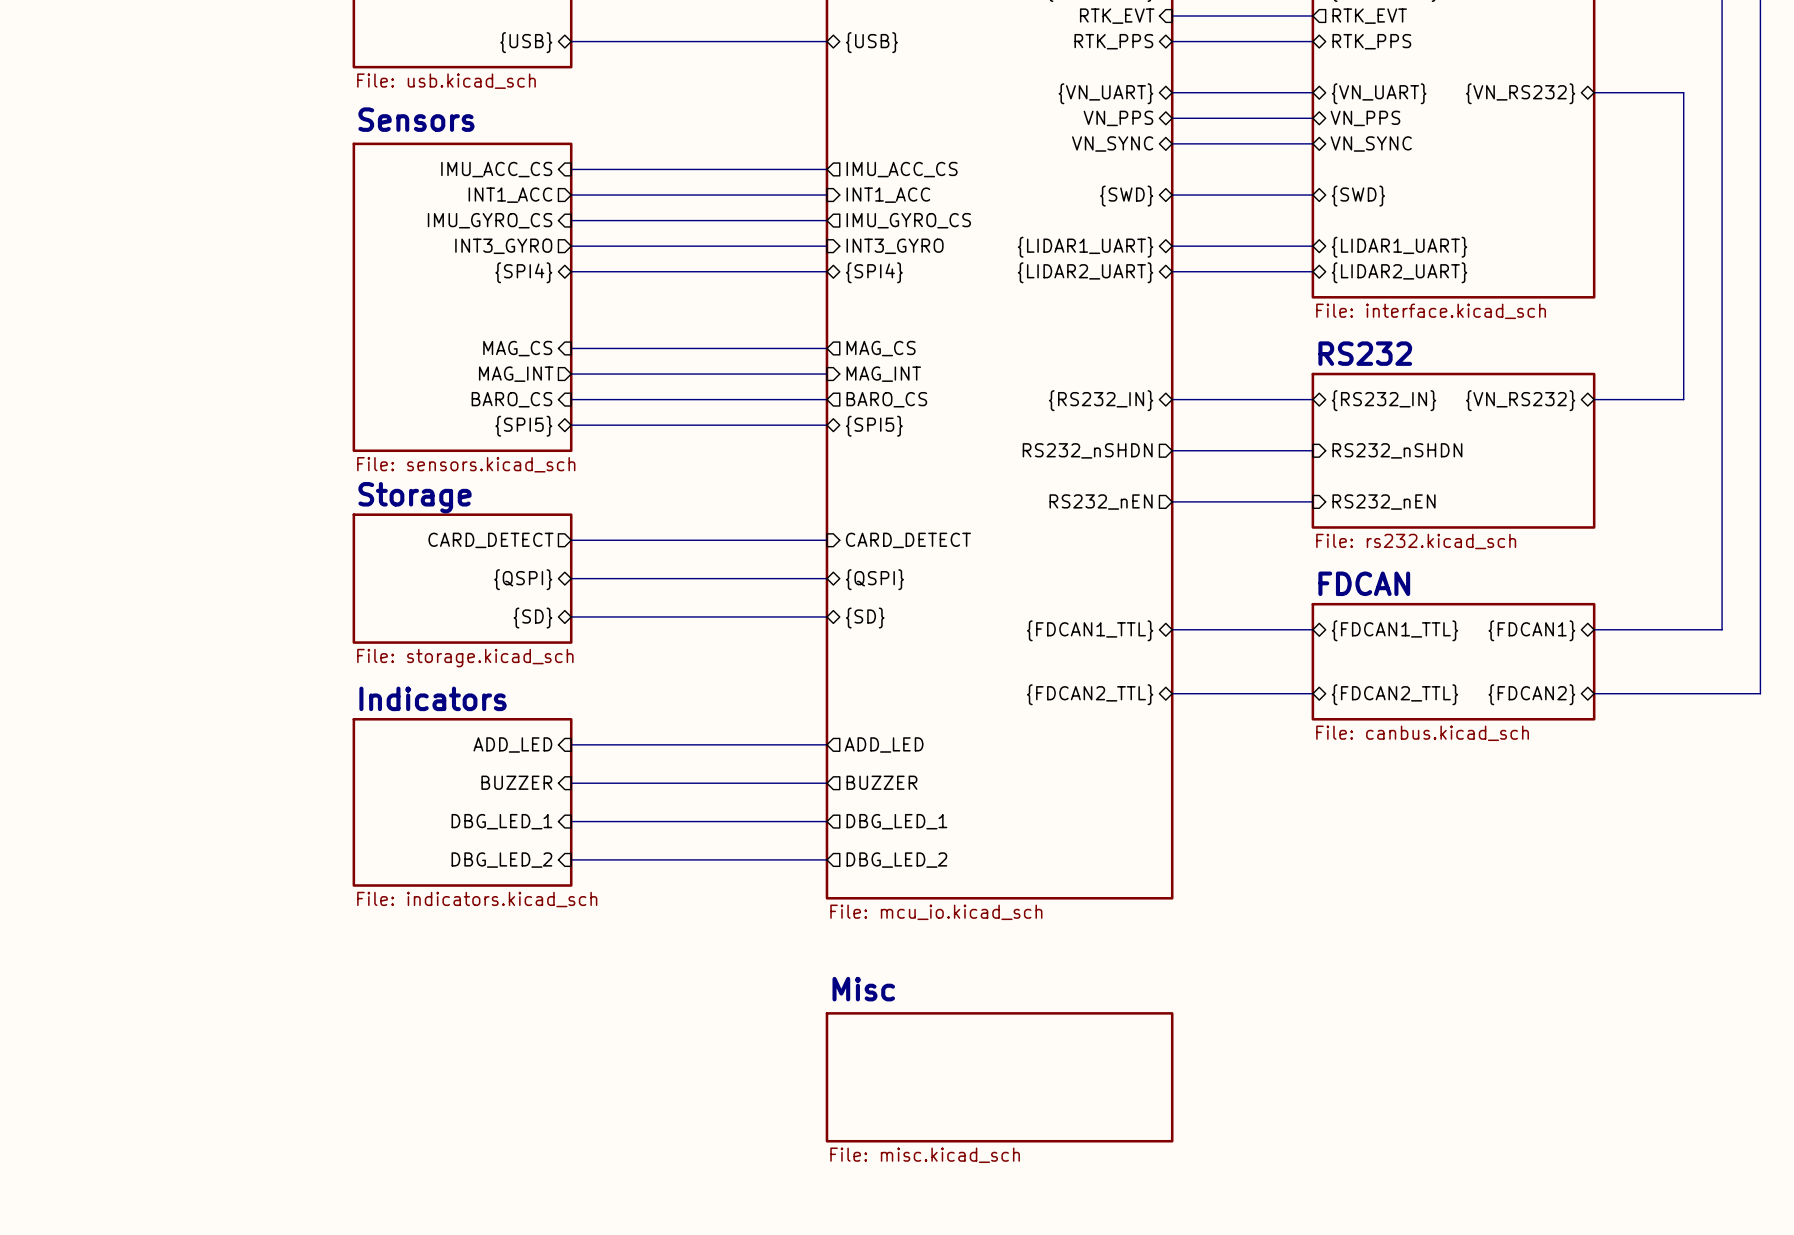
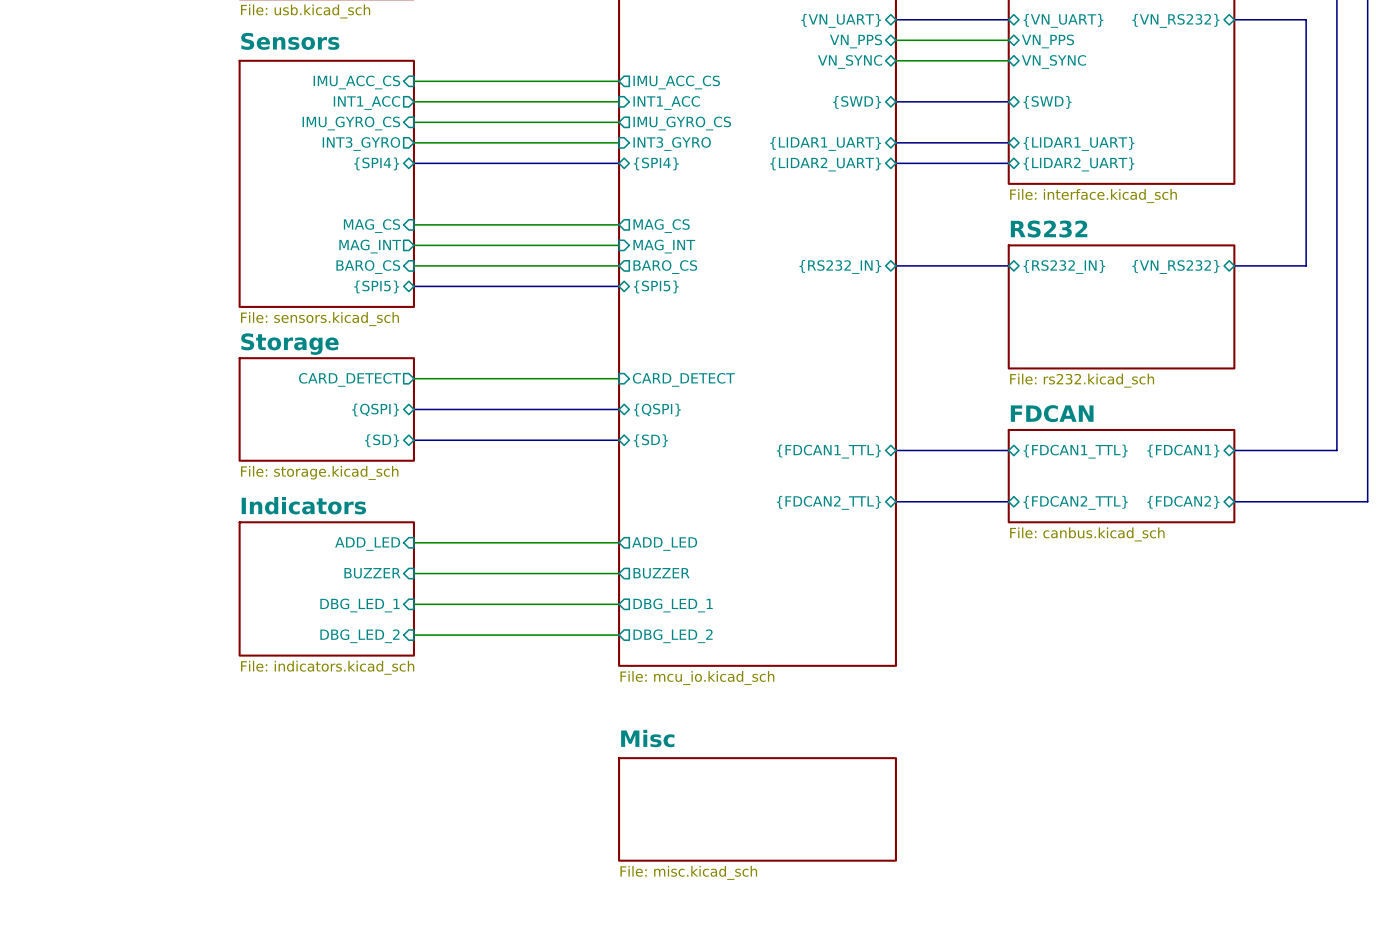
sheet pin: RS232_nSHDN (1087, 450) -> none
wire: (1172, 450) (1312, 450) -> none
sheet pin: RS232_nSHDN (1397, 450) -> none
wire: (1172, 501) (1312, 501) -> none
sheet pin: RS232_nEN (1101, 502) -> none
sheet pin: RS232_nEN (1384, 502) -> none

